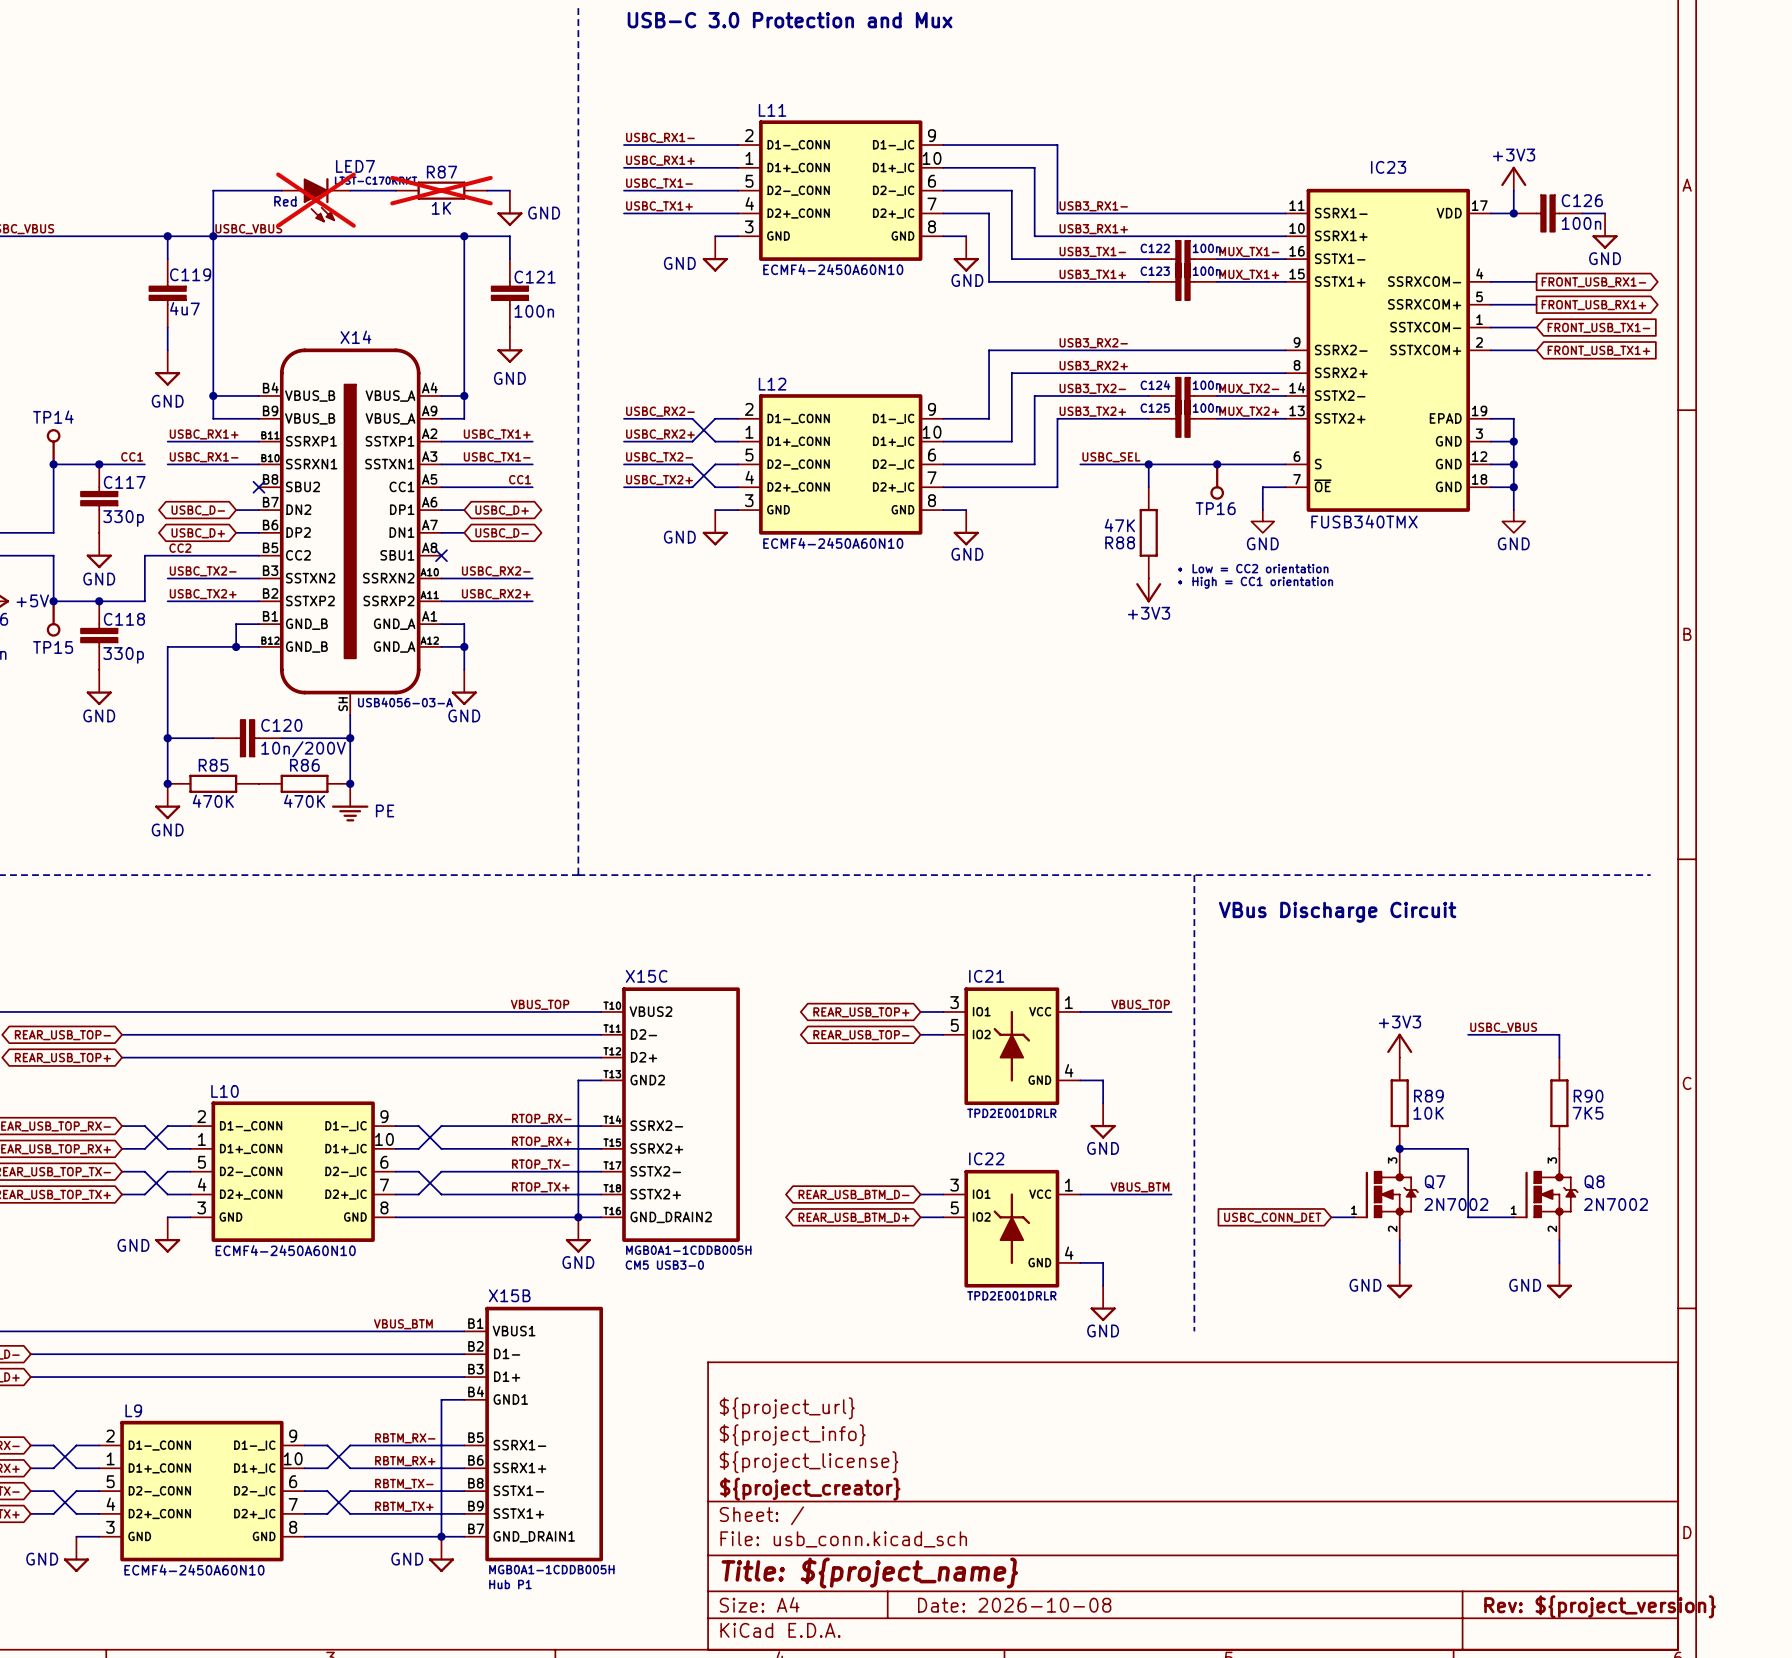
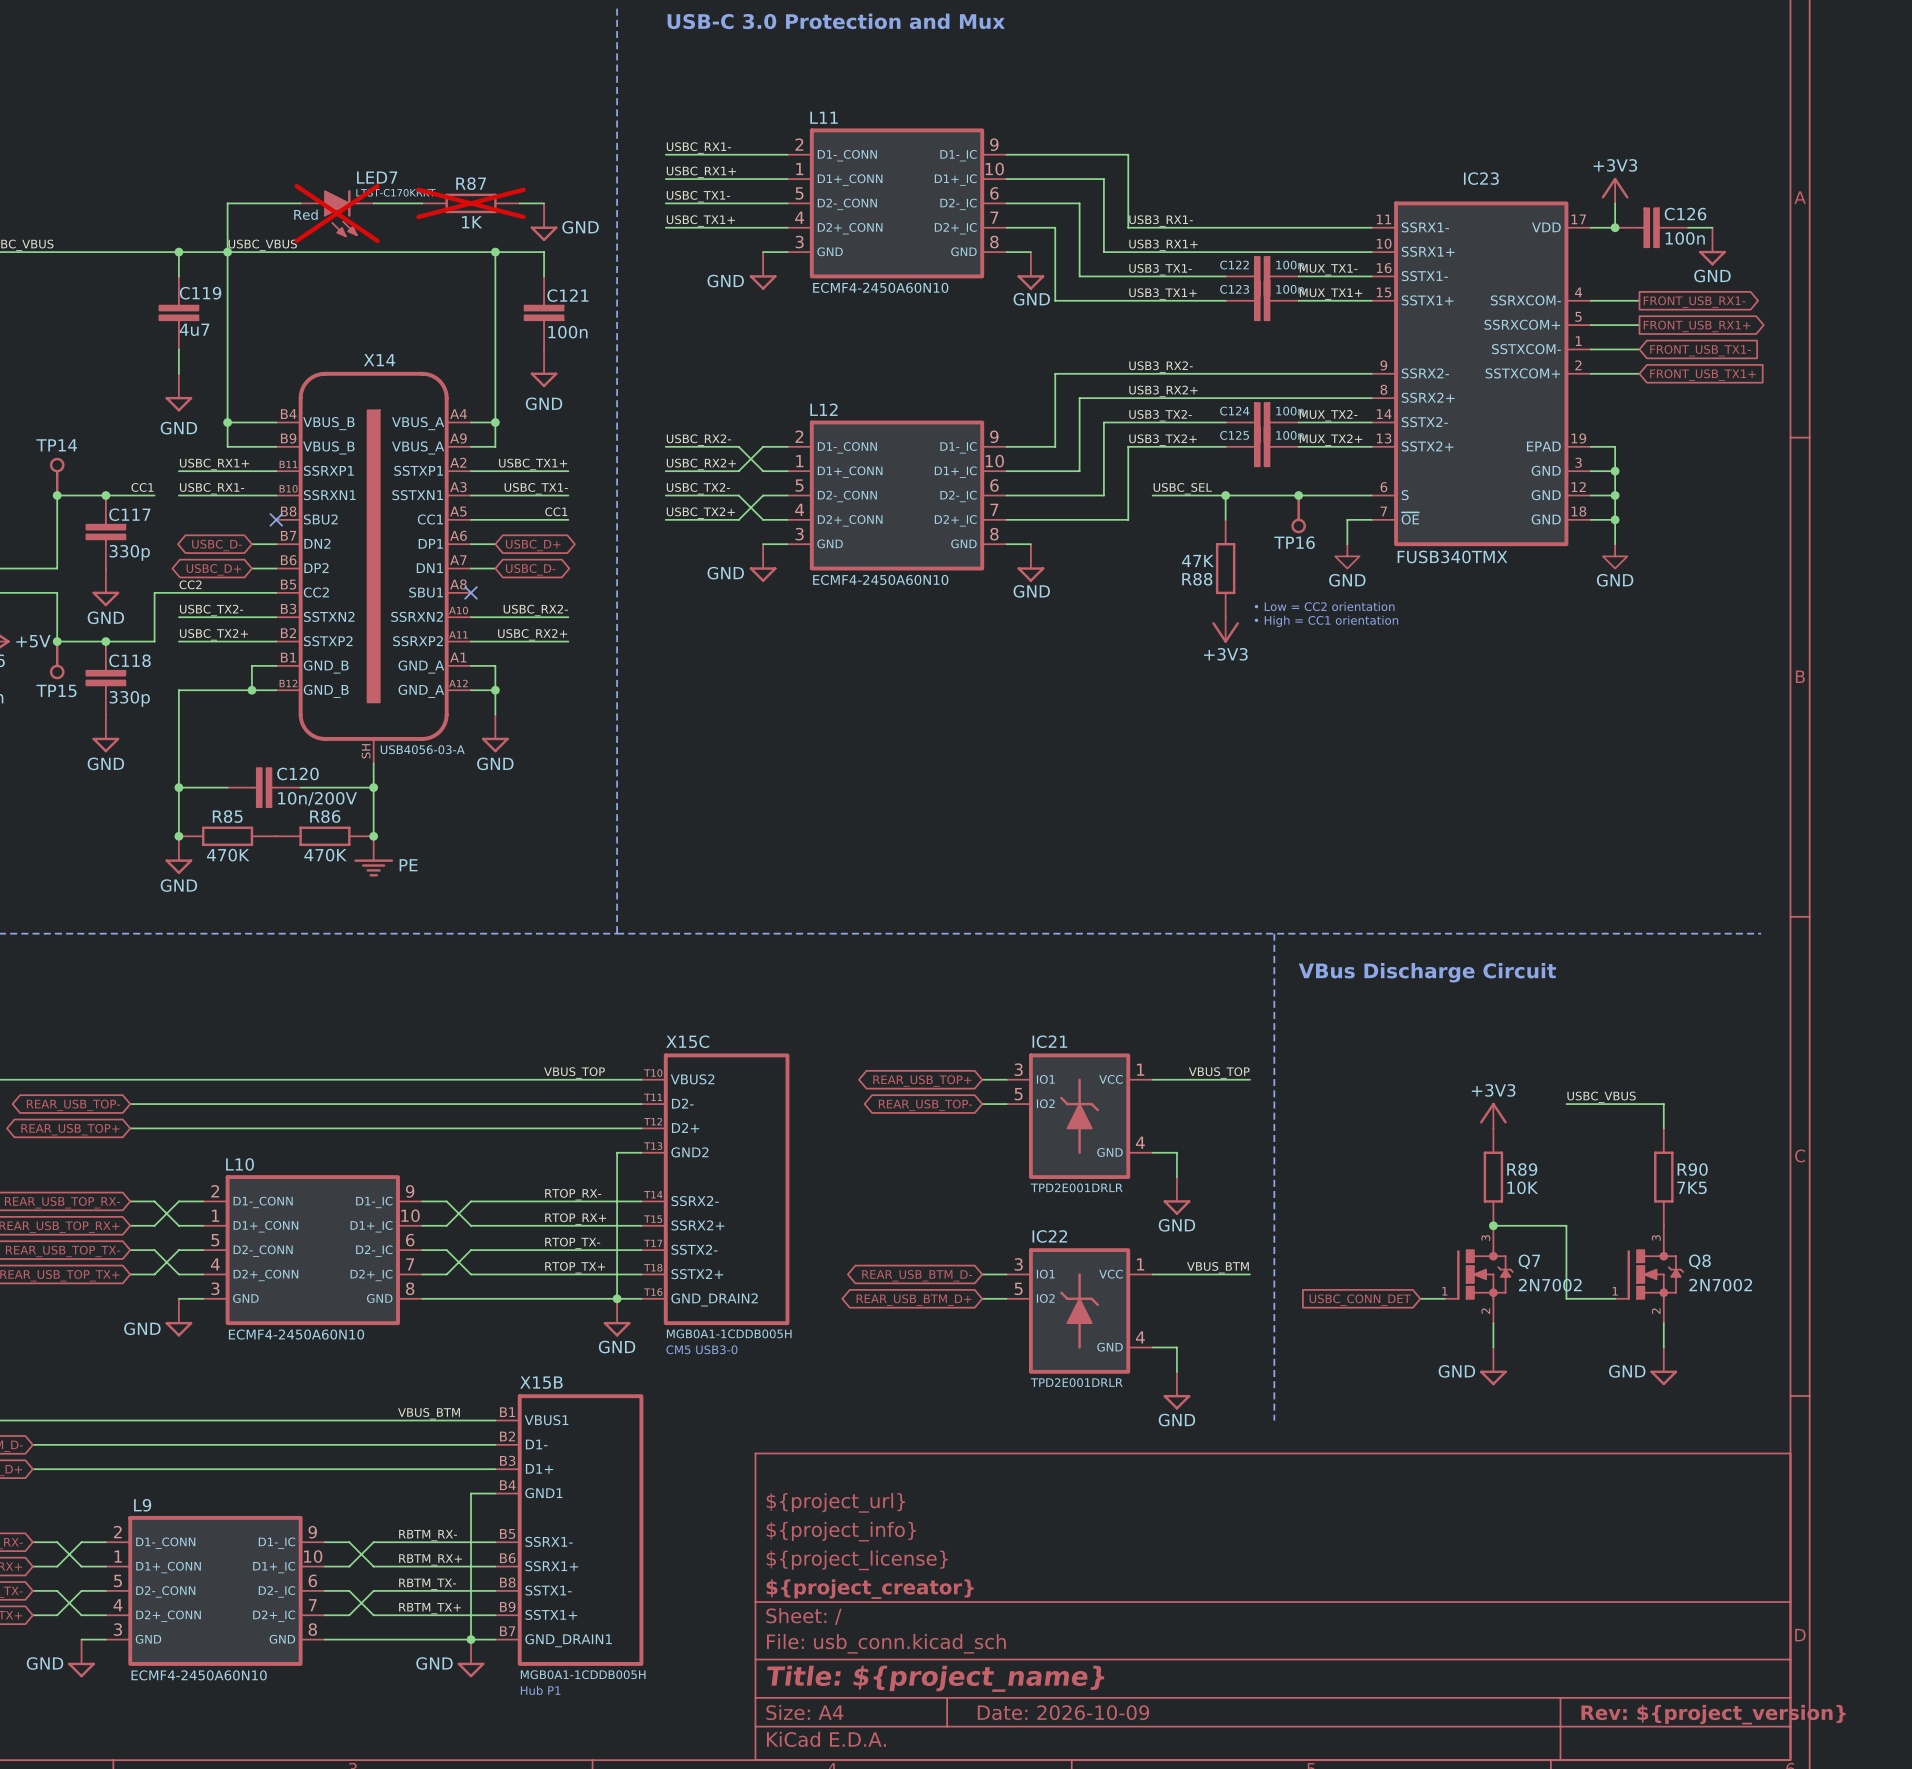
title block: Date: 2026-10-08 (1014, 1605) -> Date: 2026-10-09 (1063, 1712)

